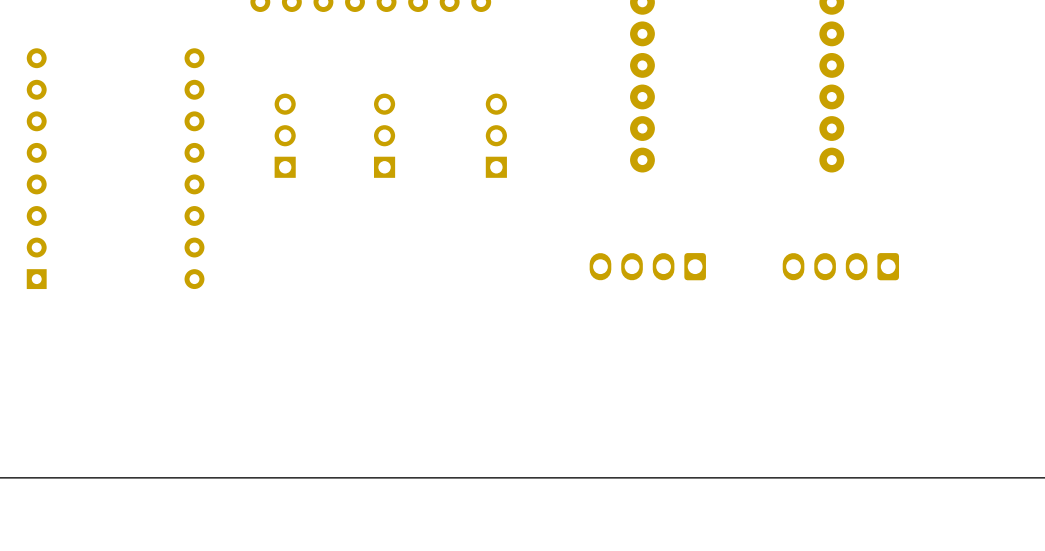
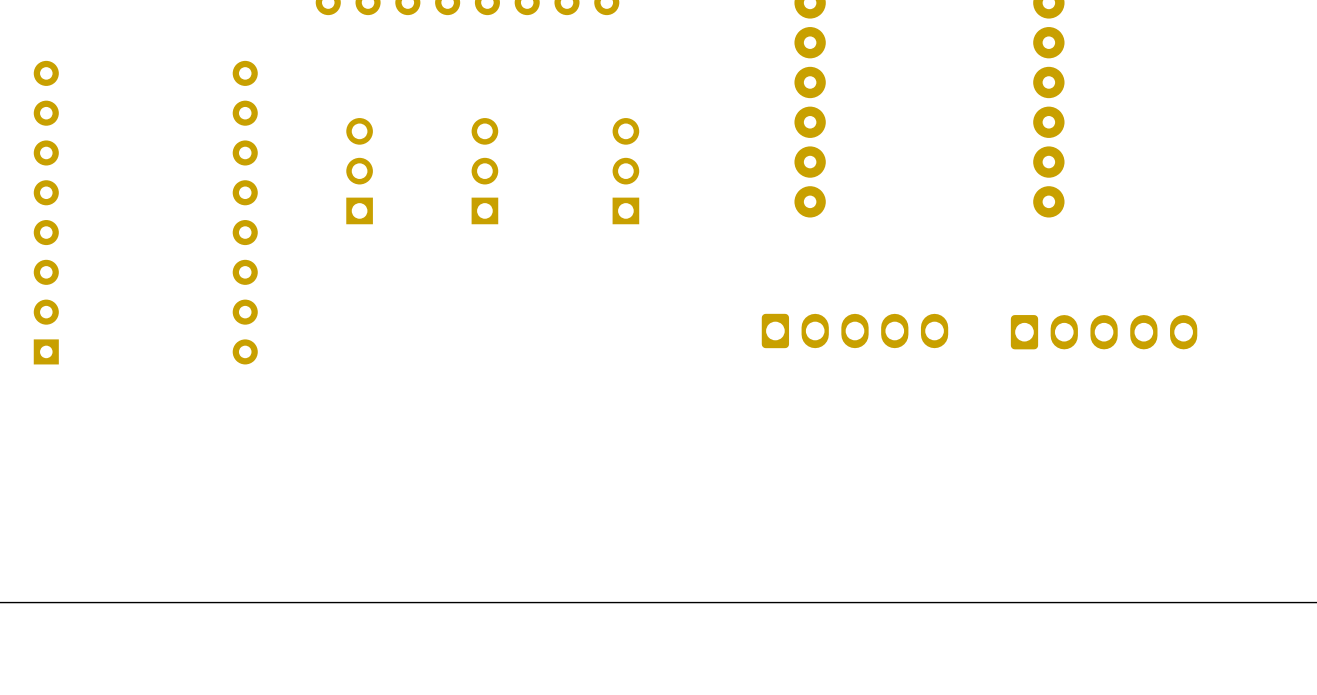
part: none -> (854, 331)
part: none -> (1104, 332)
part: (647, 266) -> none
part: (840, 266) -> none

